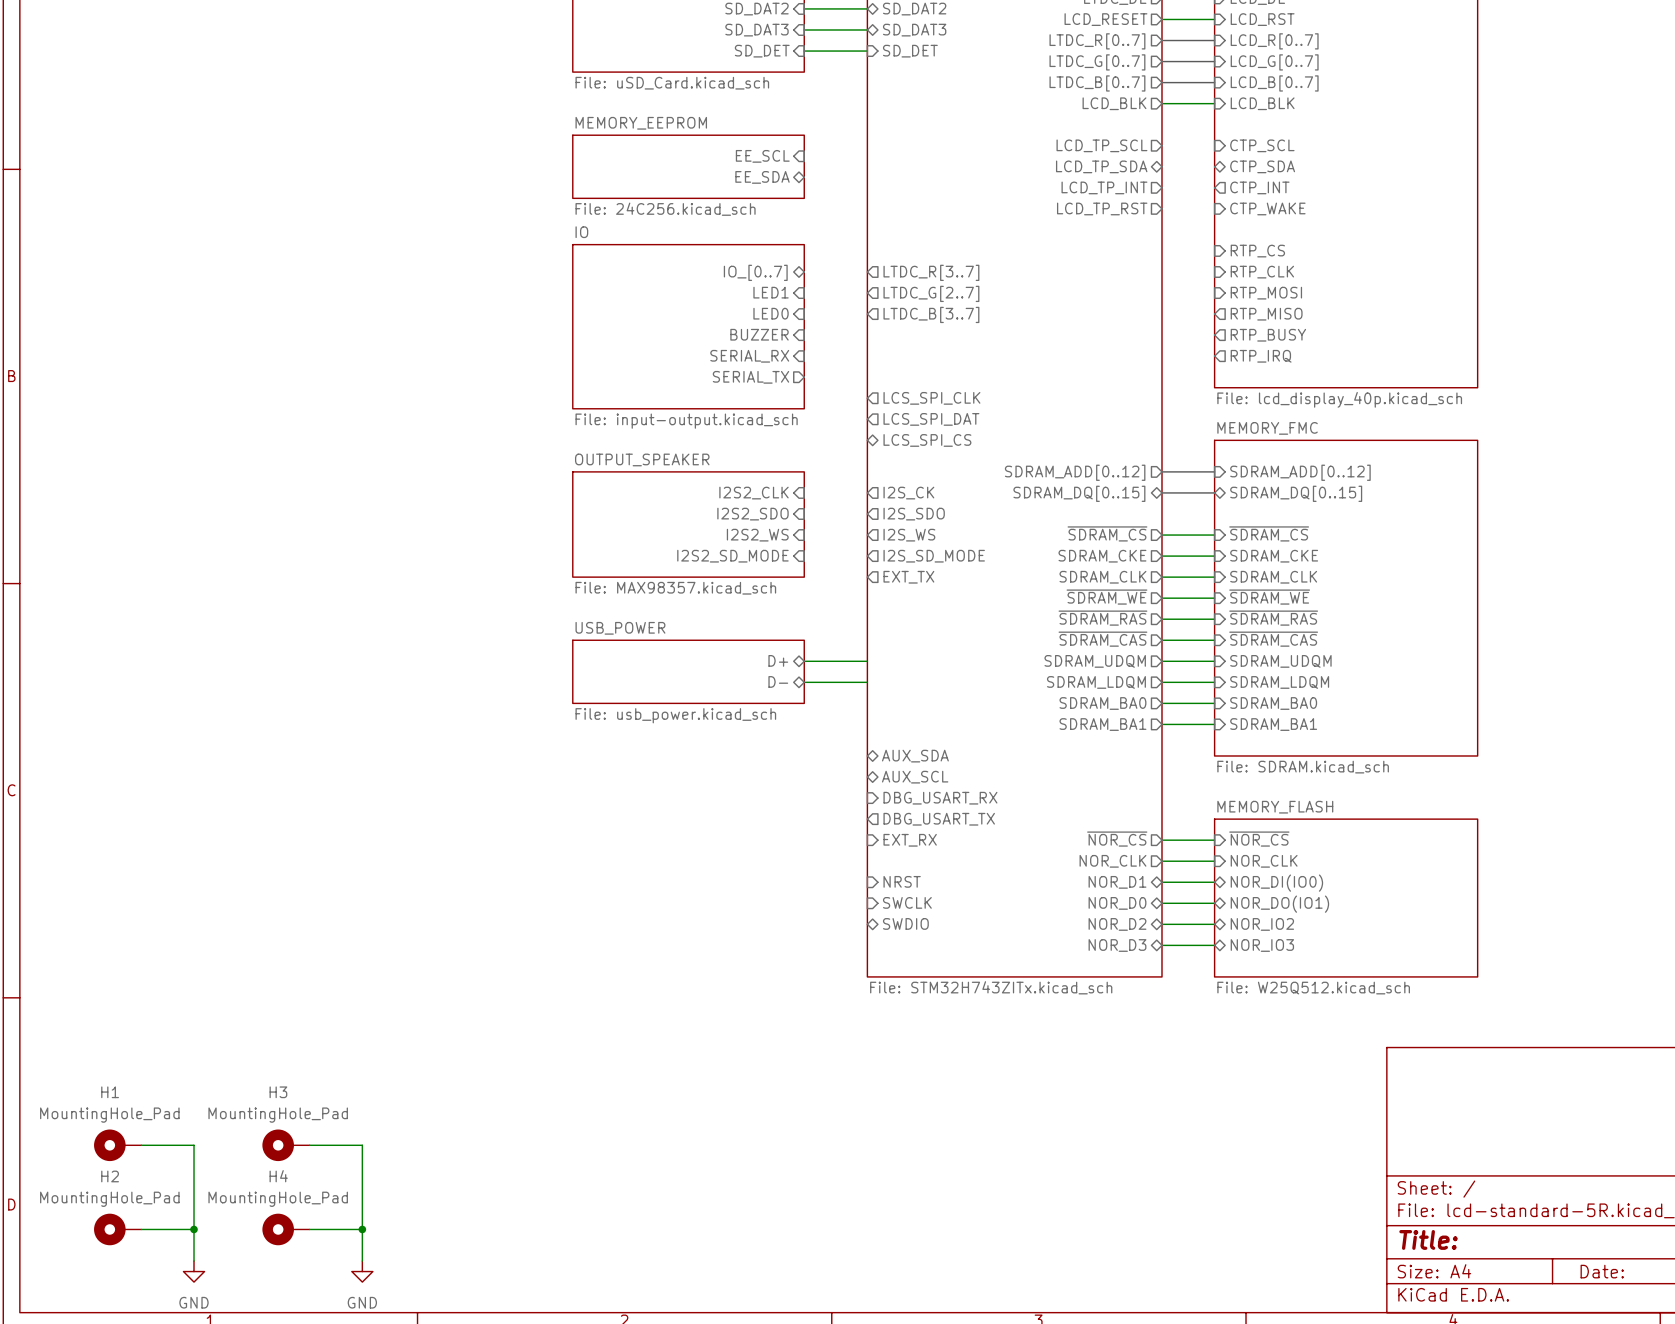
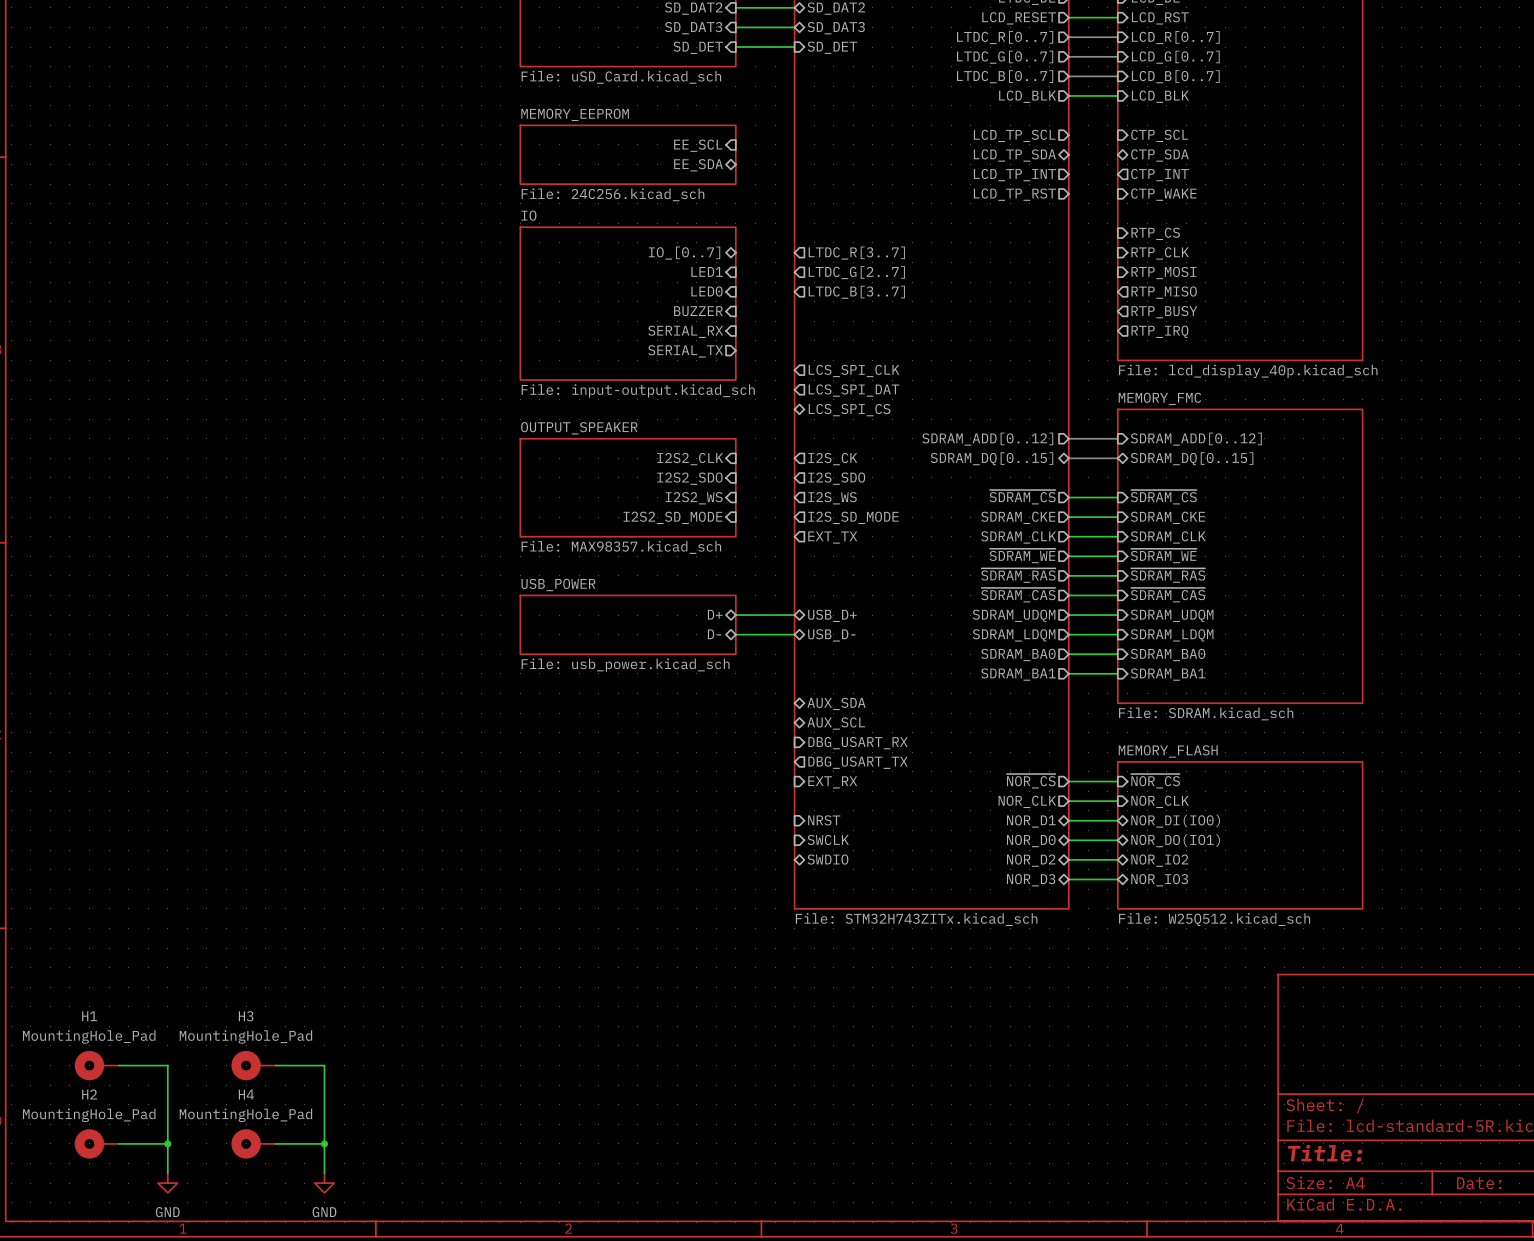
sheet pin: none -> USB_D+ (832, 615)
sheet pin: none -> USB_D- (831, 635)

